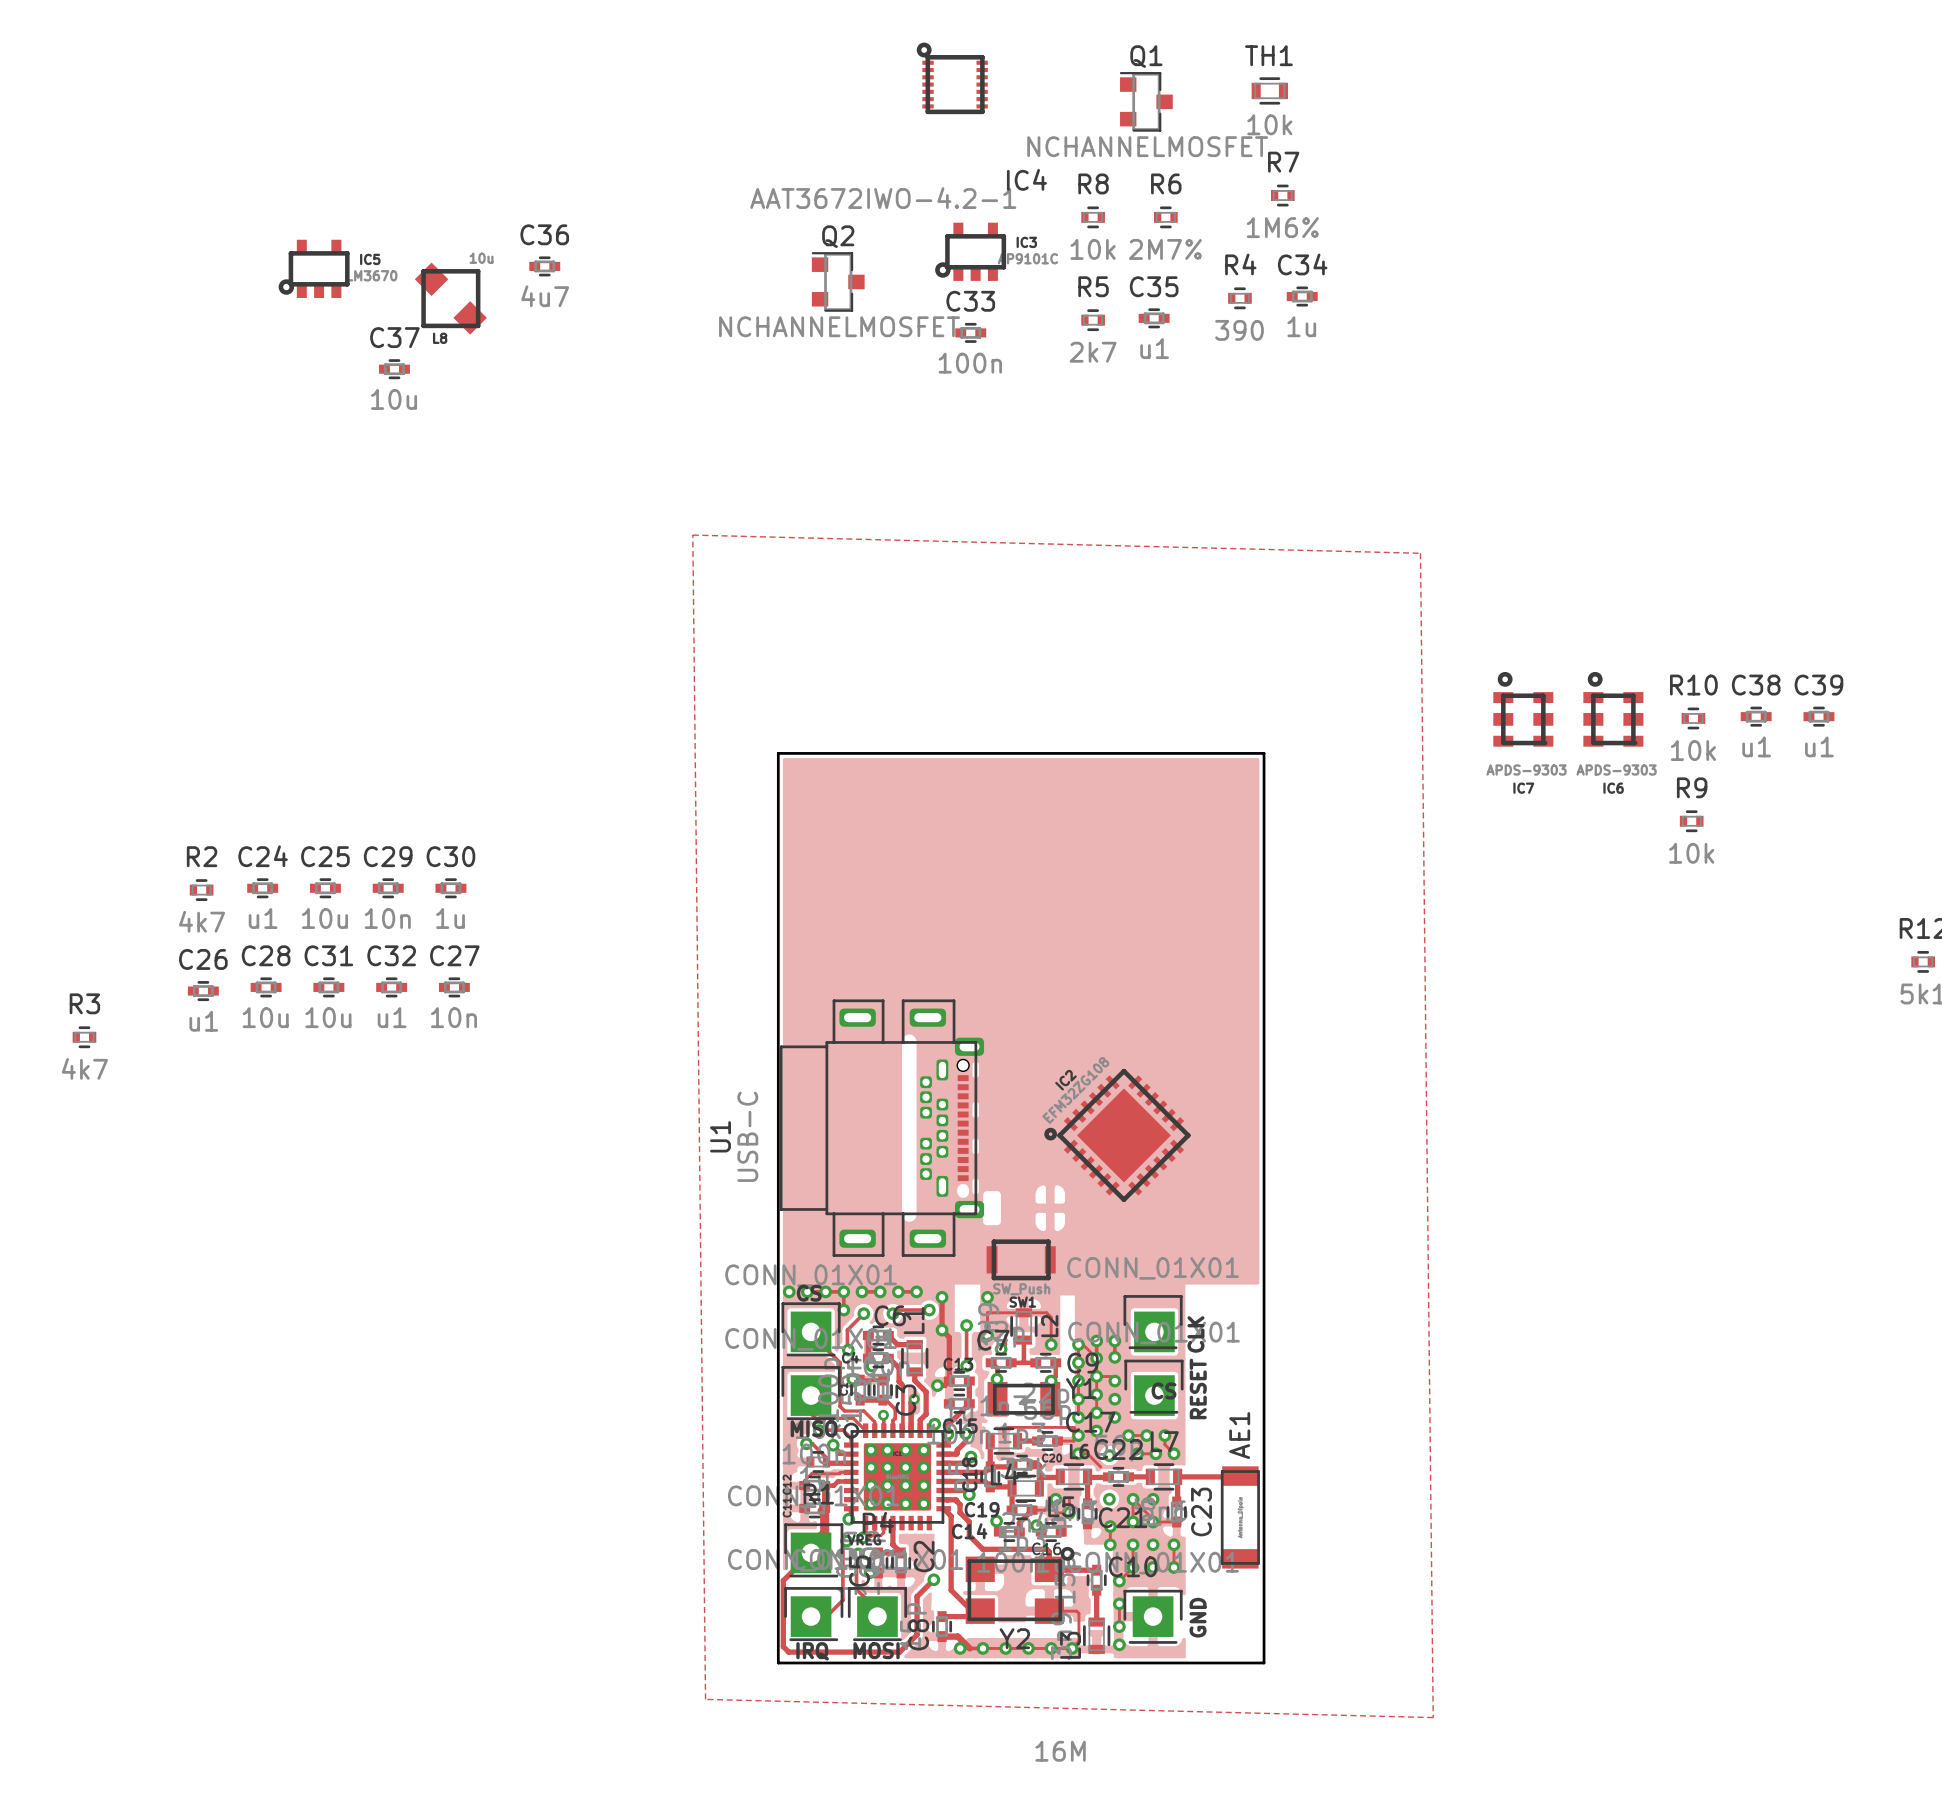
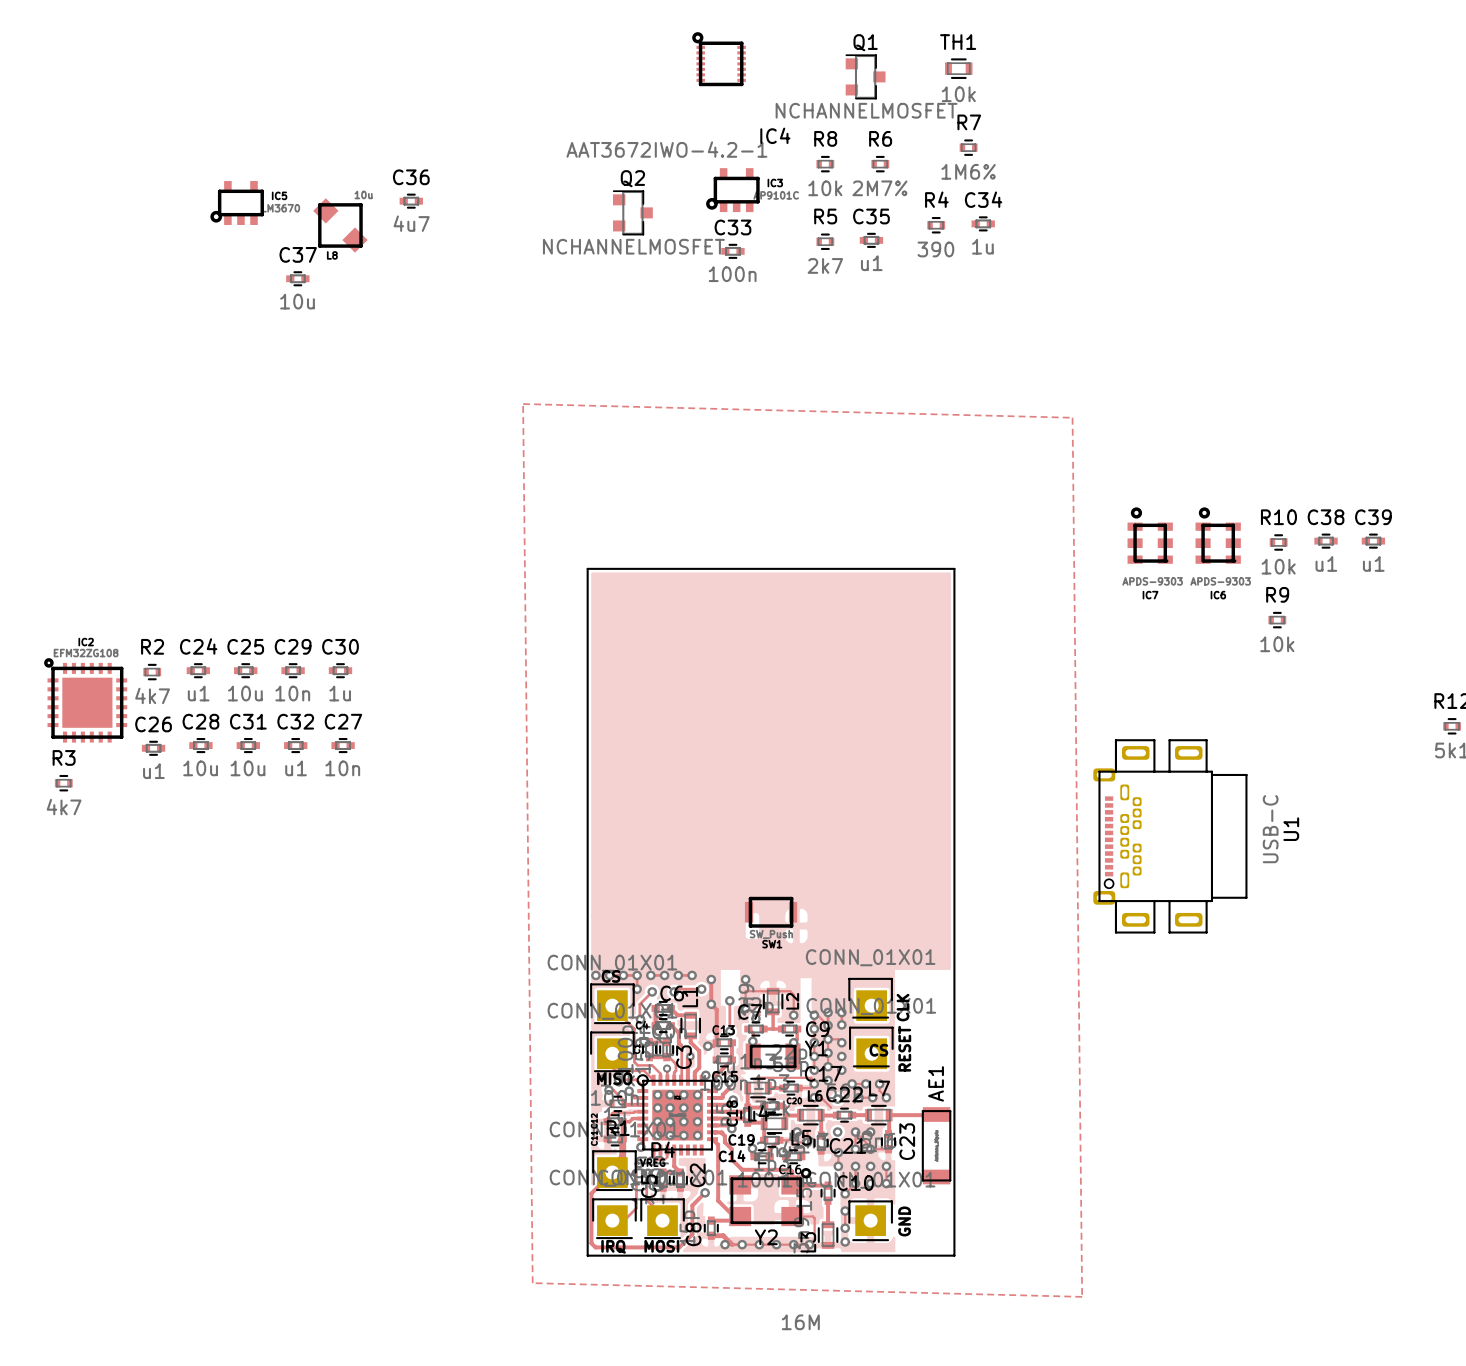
U1 rotation: 0° (881, 1128) -> 180° (1170, 836)
U1 position: (881, 1128) -> (1170, 836)
IC2 rotation: 0° (1117, 1135) -> 45° clockwise (85, 700)
IC2 position: (1117, 1135) -> (85, 700)
SW1 position: (1021, 1259) -> (771, 912)

